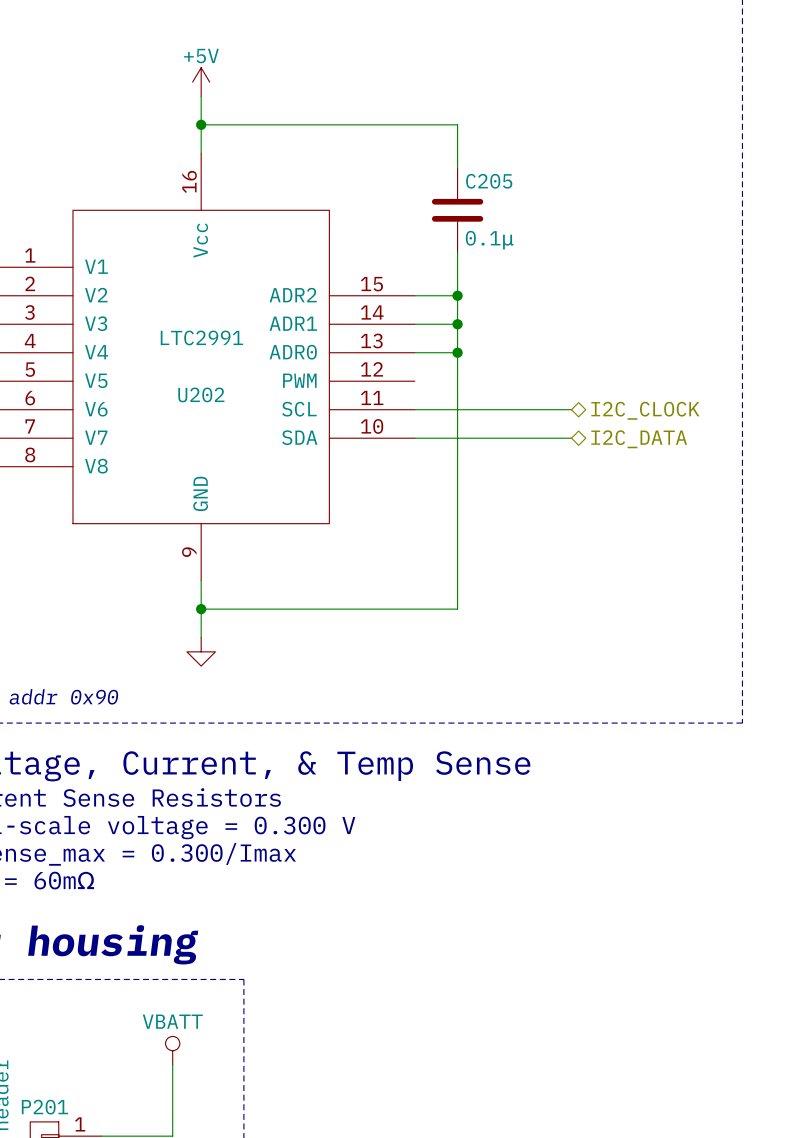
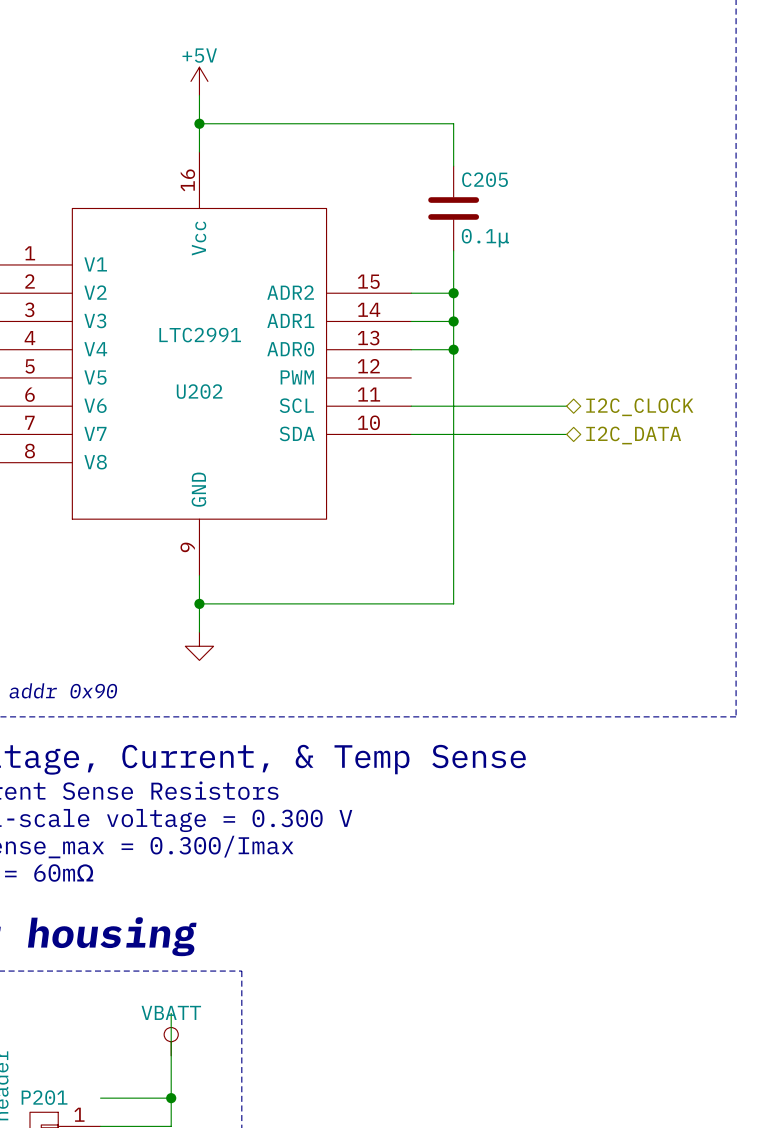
wire: none -> (171, 1013) (171, 1055)
wire: none -> (100, 1098) (171, 1098)
junction: none -> (171, 1098)

